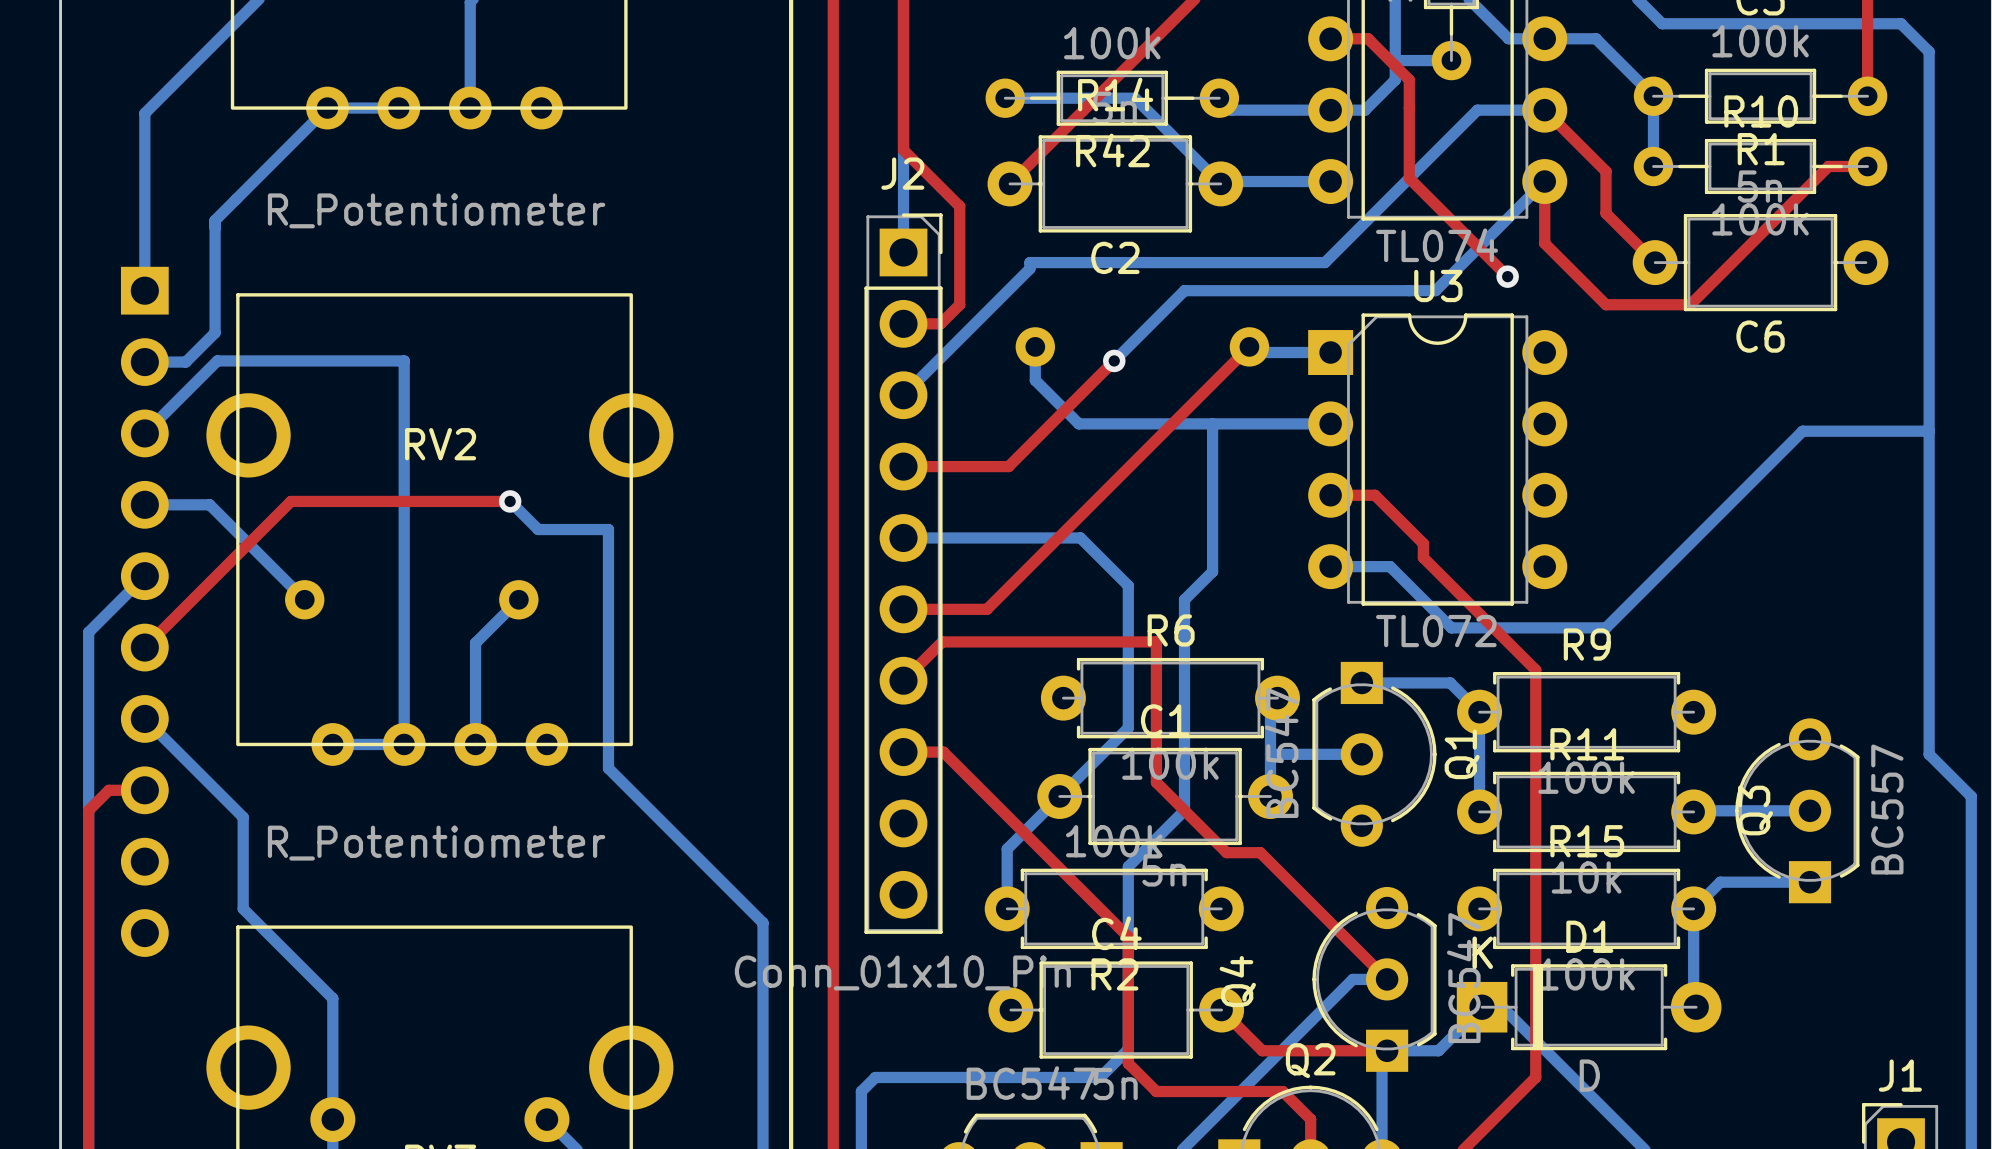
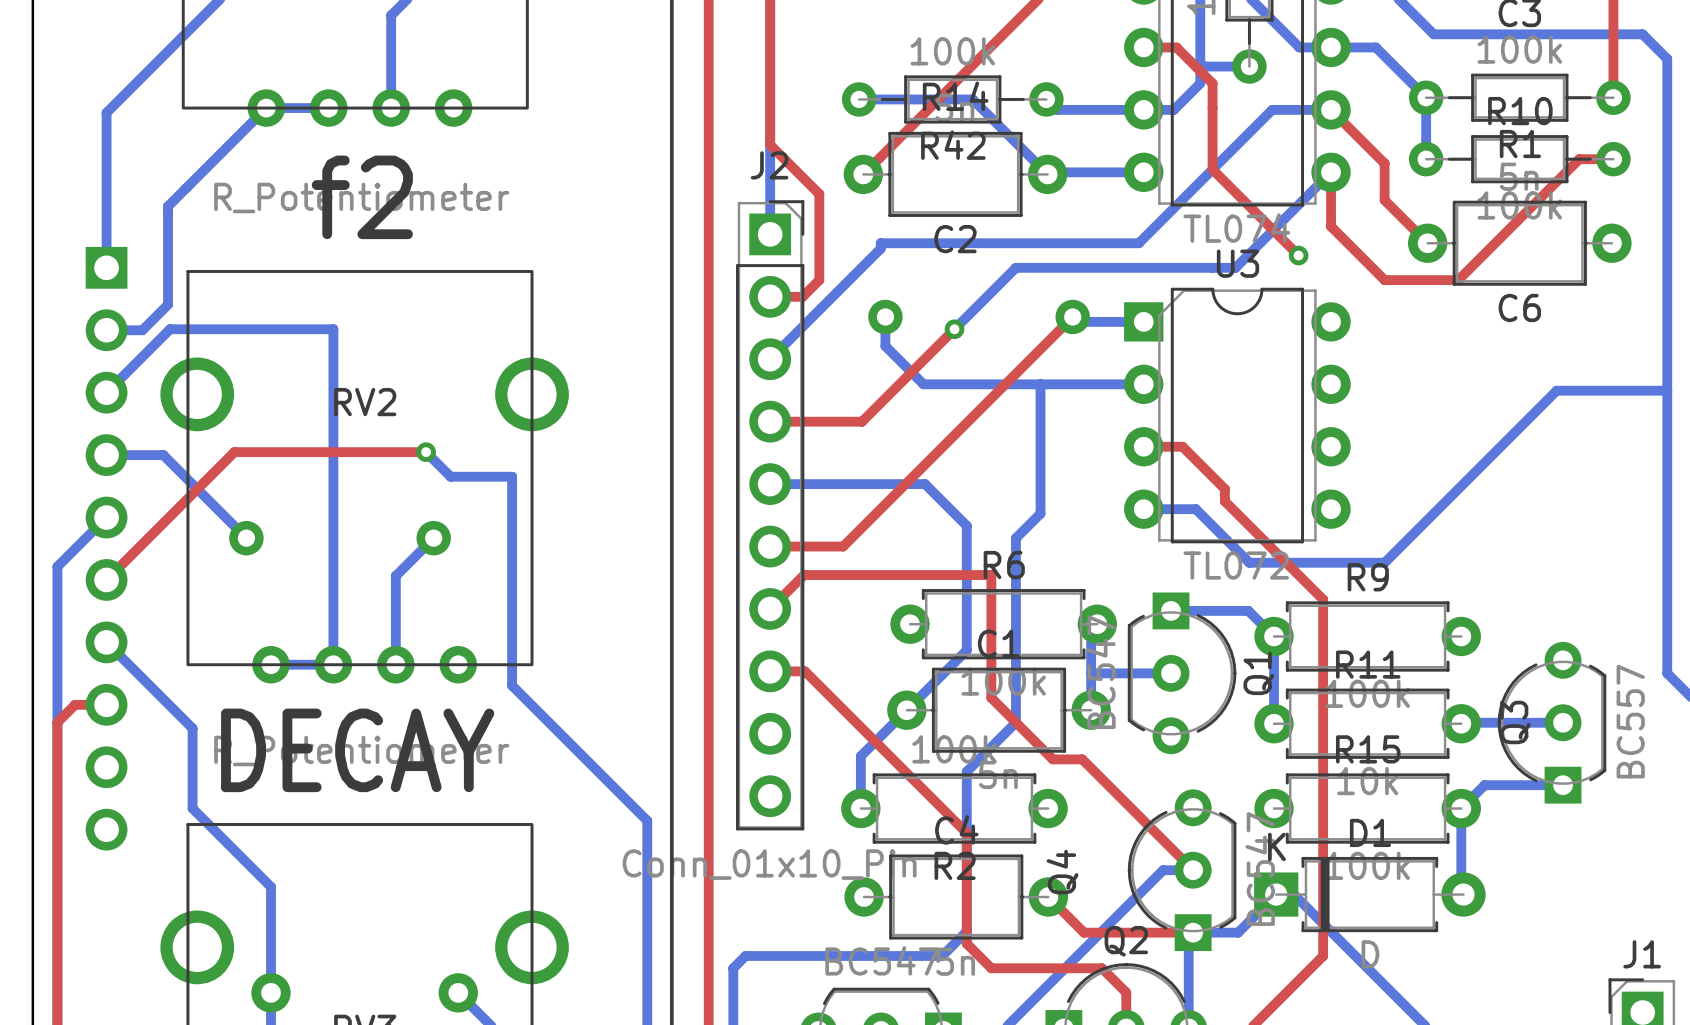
text: none -> f2 (362, 197)
text: none -> DECAY (357, 750)

